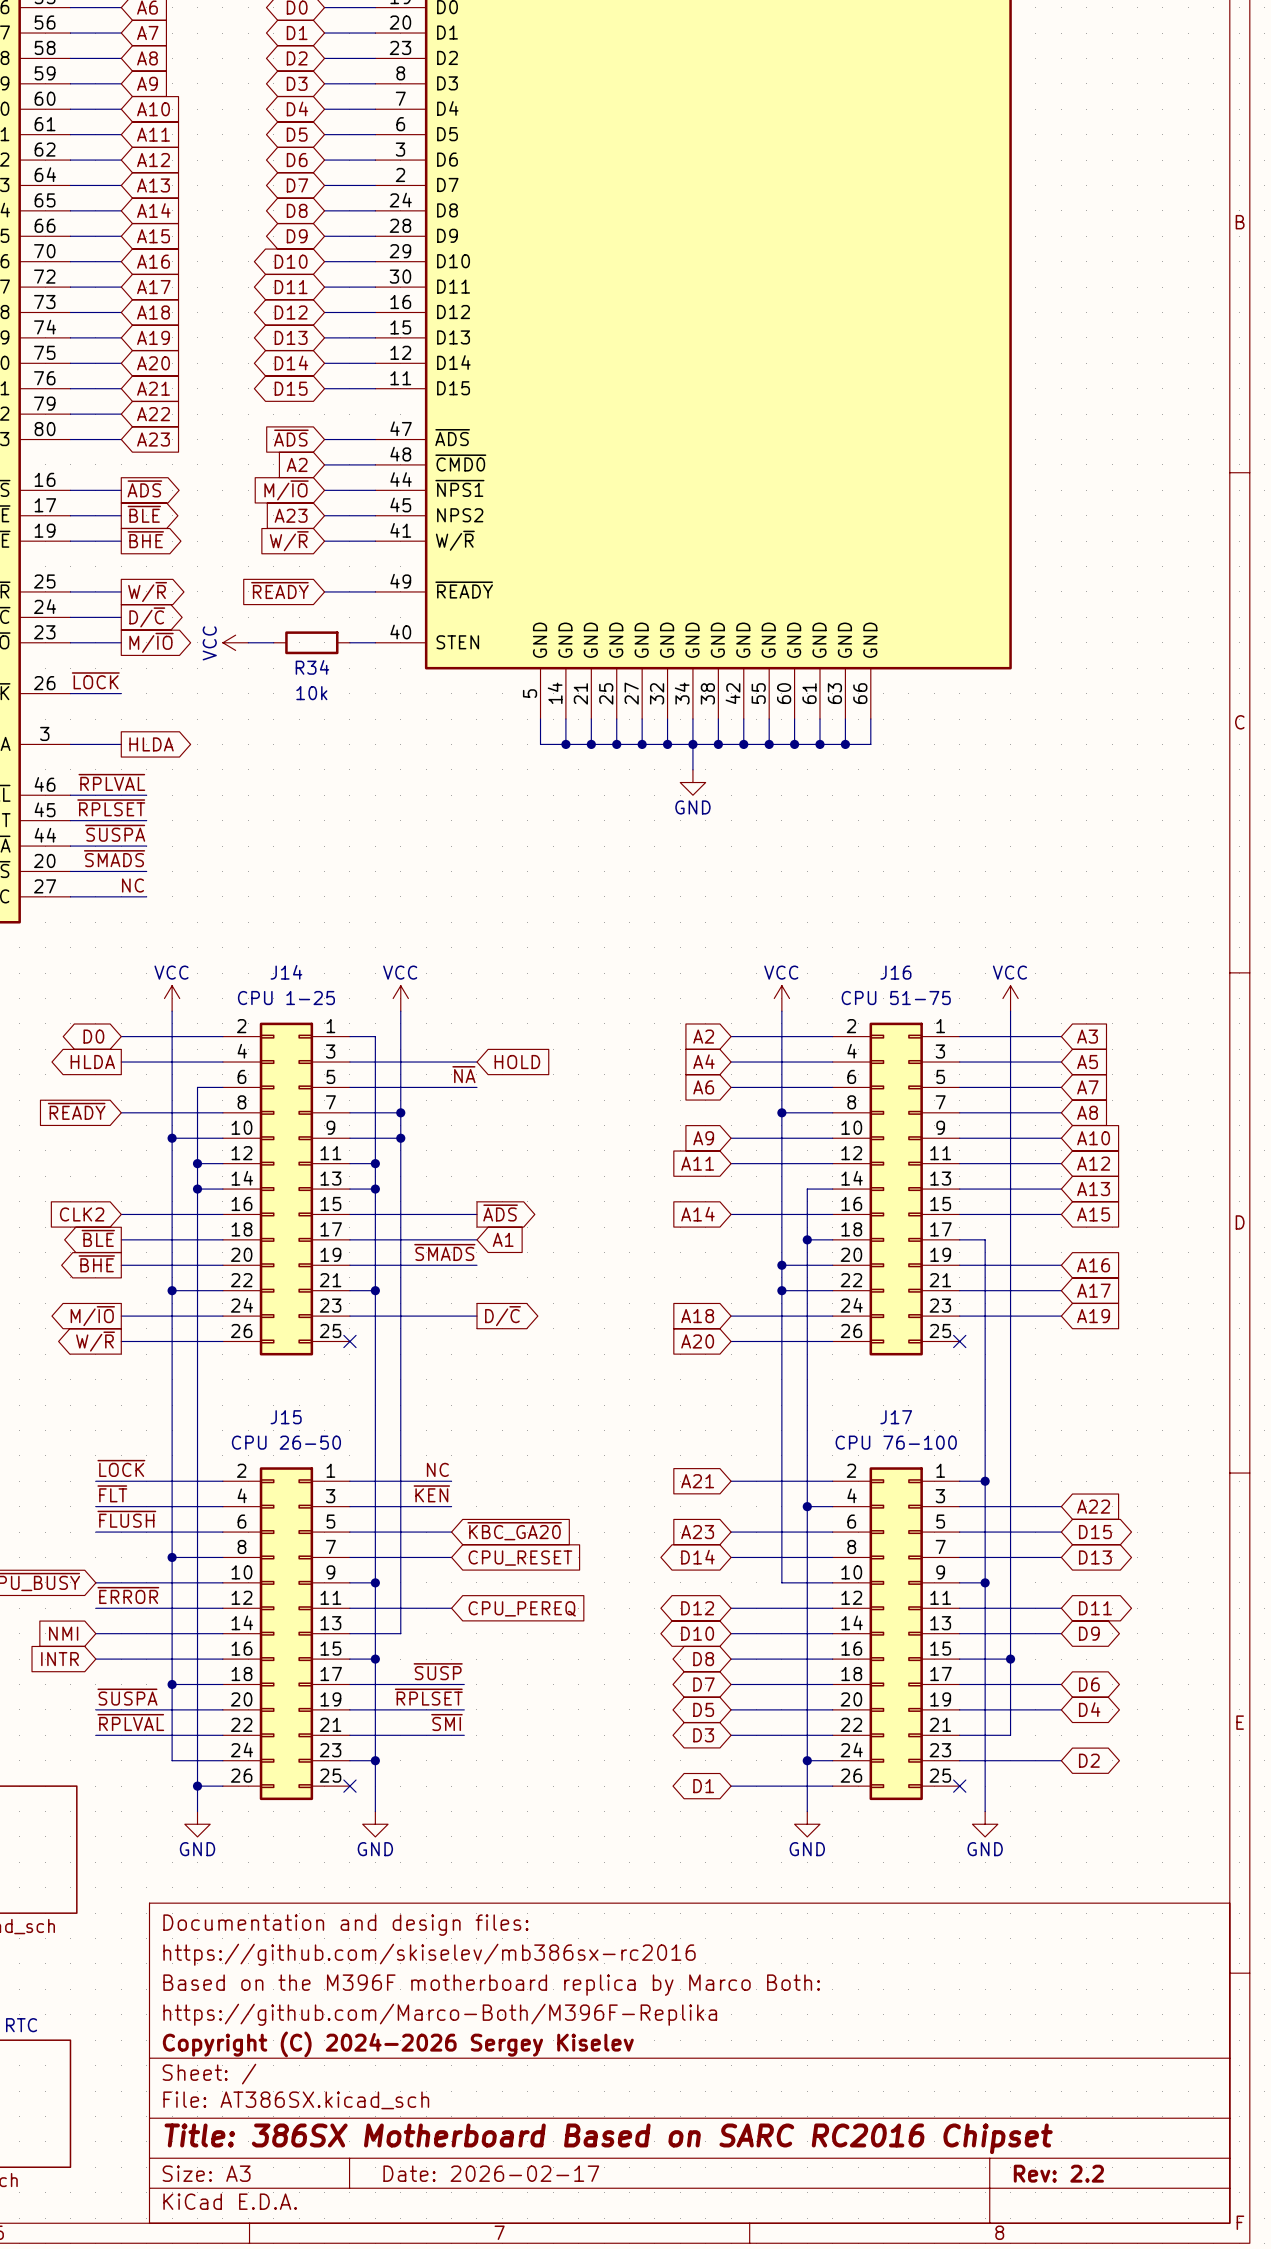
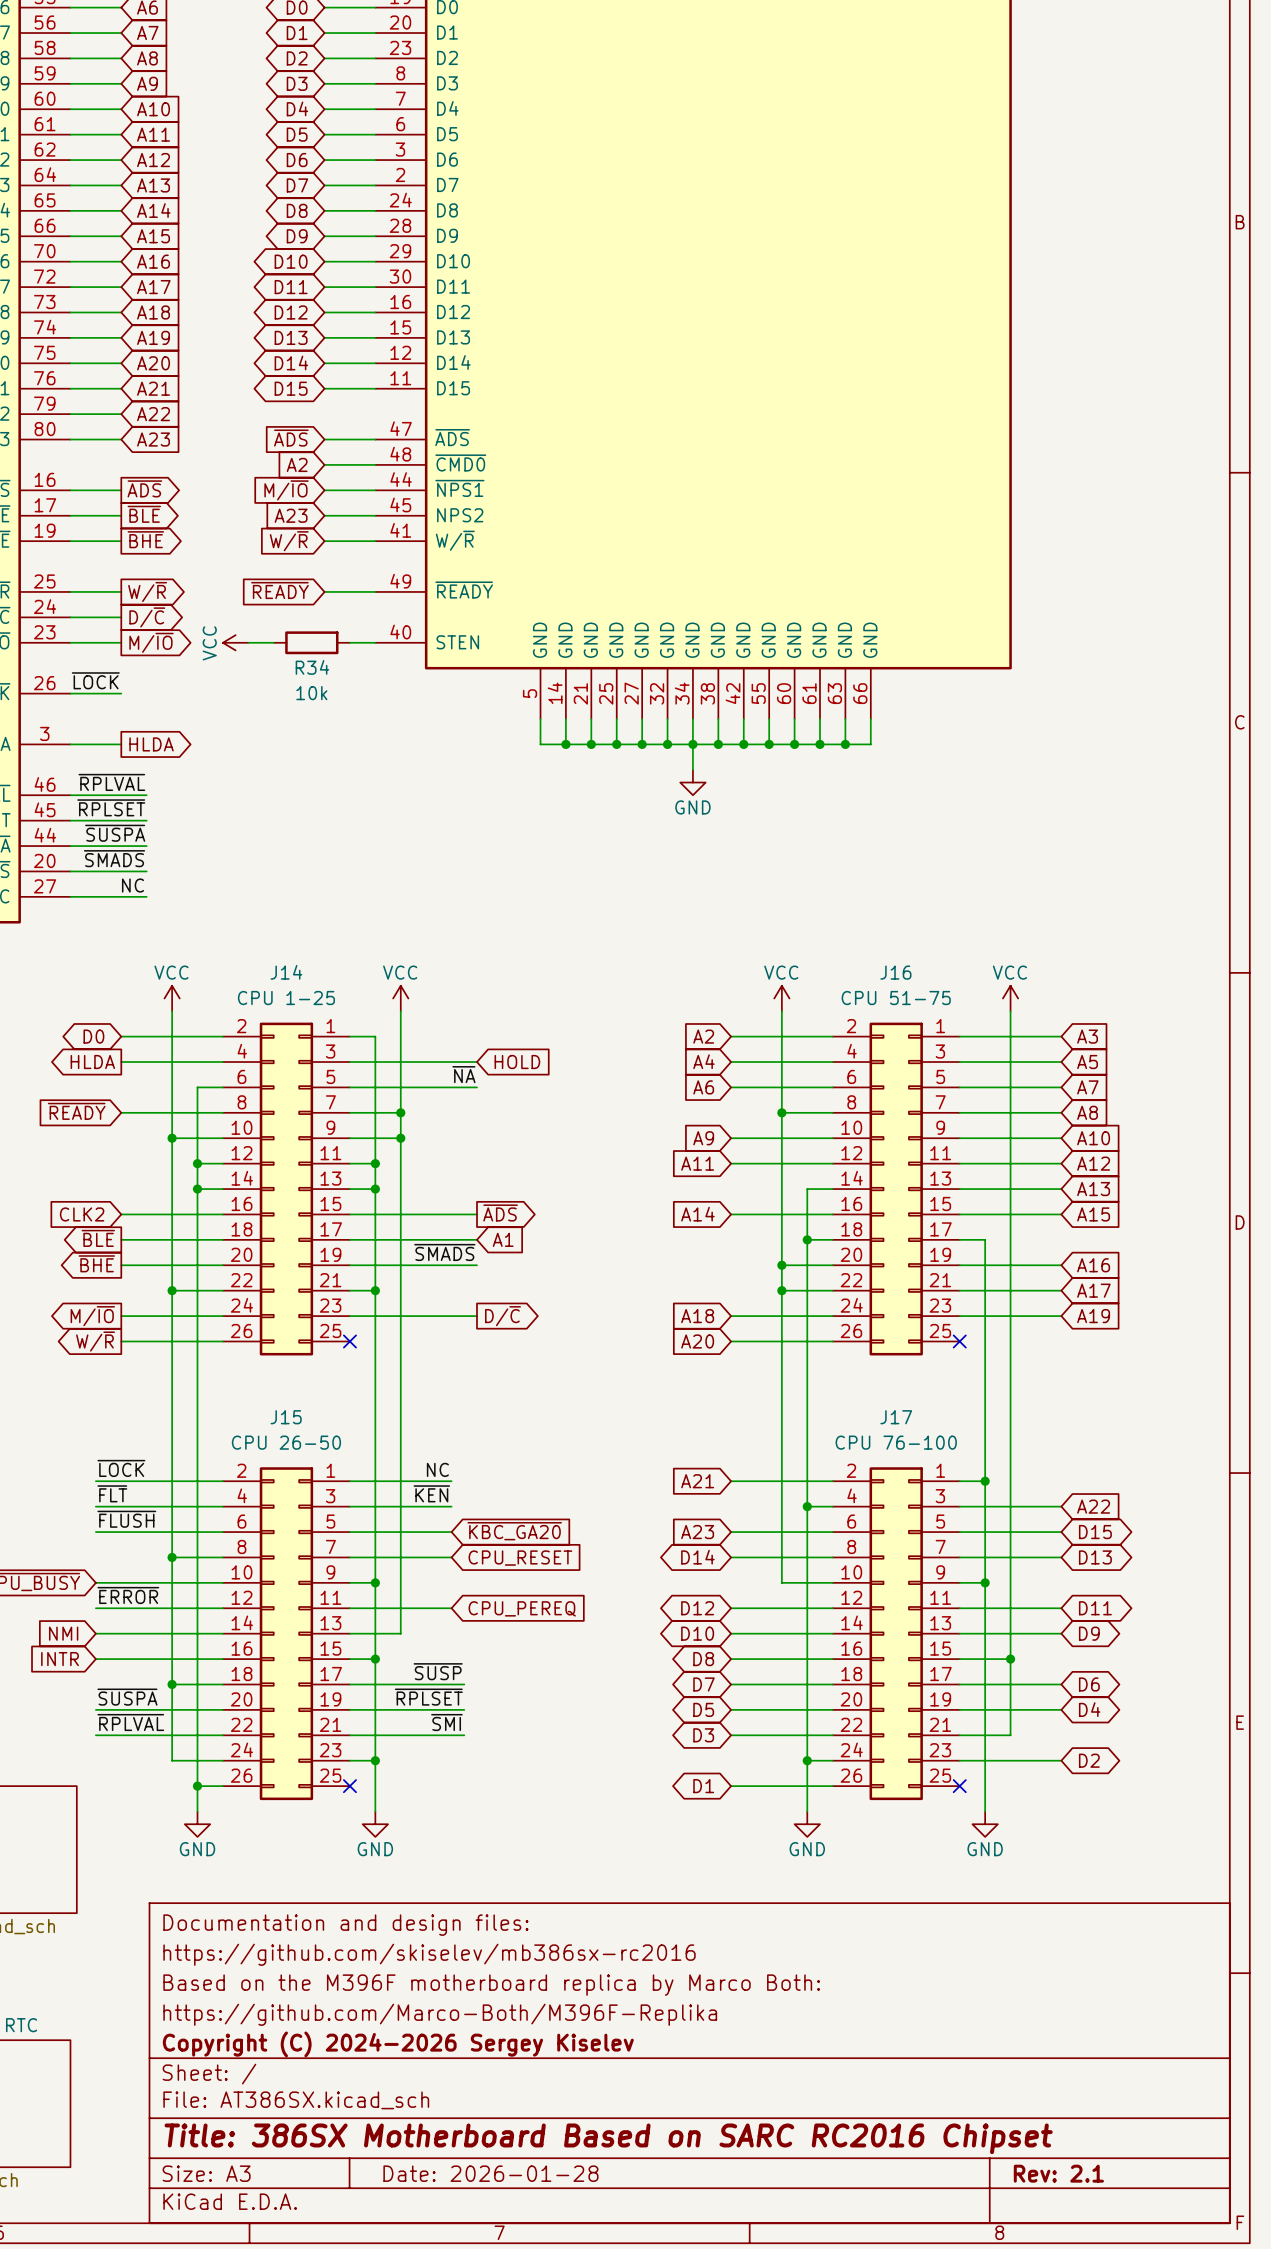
title block: Date: 2026-02-17 (491, 2173) -> Date: 2026-01-28 (490, 2173)
title block: Rev: 2.2 (1058, 2173) -> Rev: 2.1 (1058, 2173)

